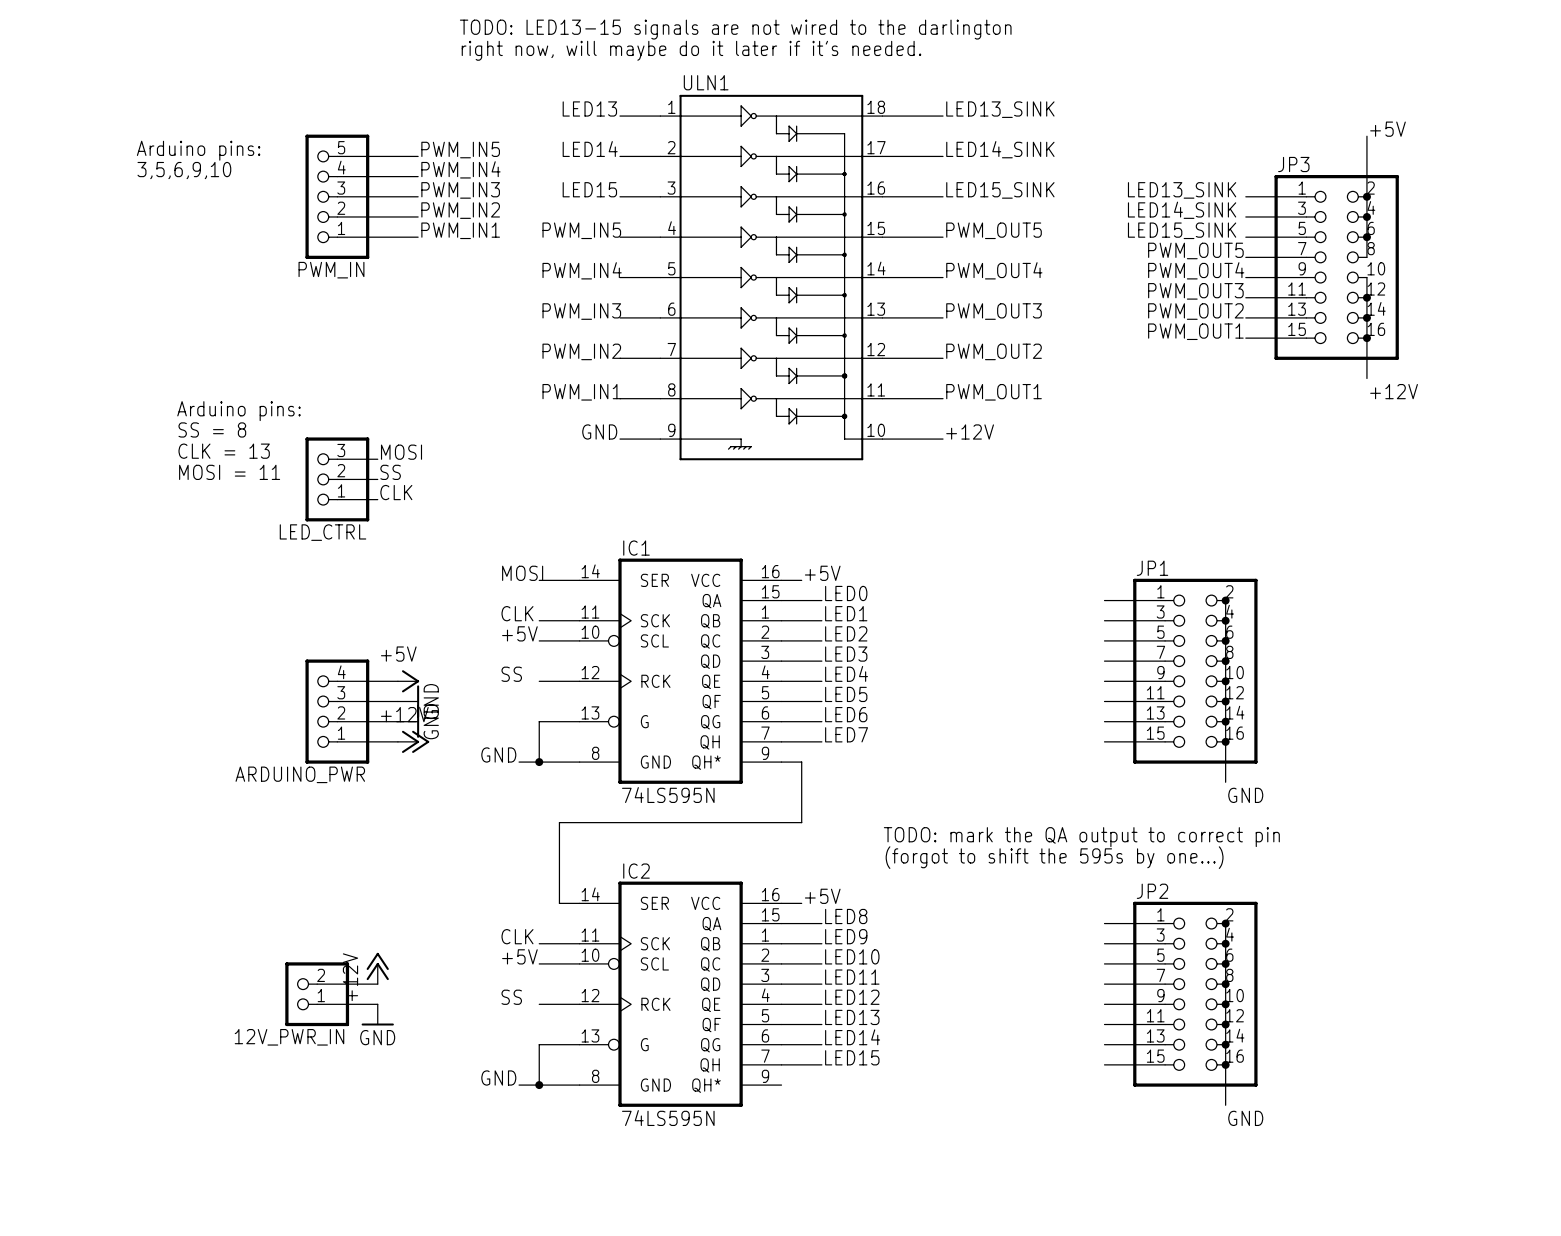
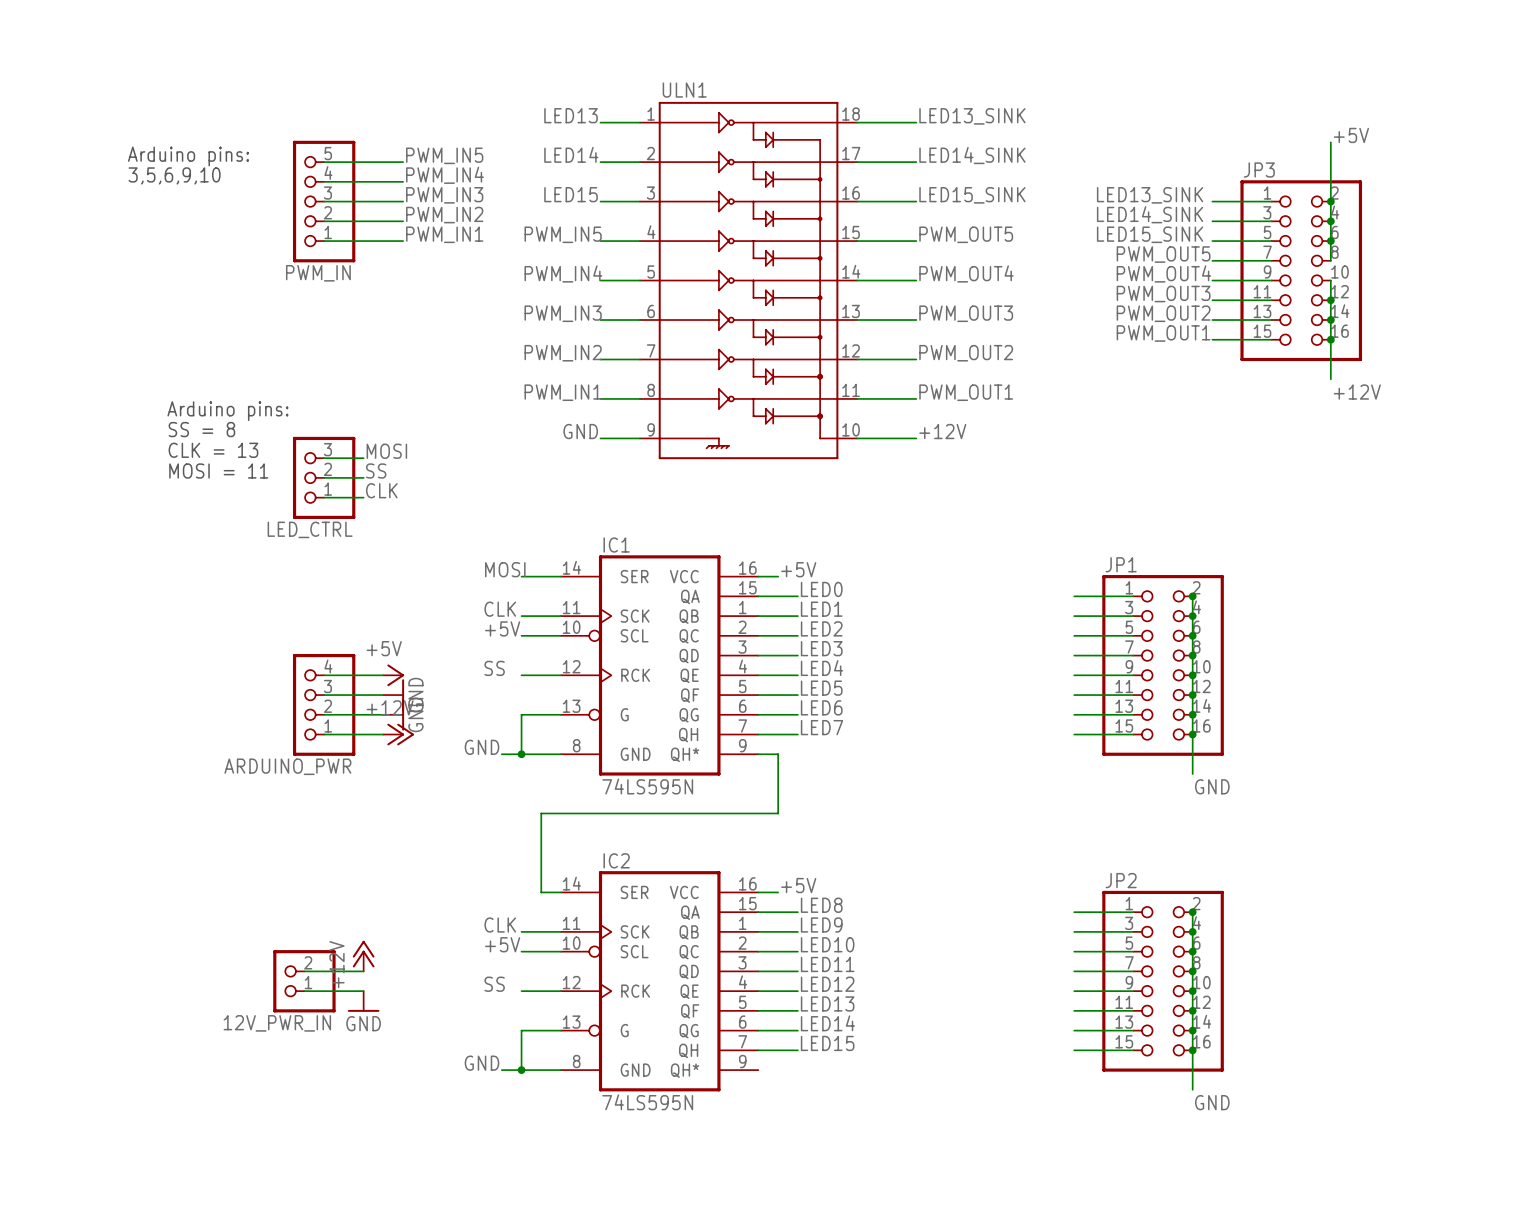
text: TODO: LED13-15 signals are not wired to the darlington (735, 29) -> none
text: right now, will maybe do it later if it's needed. (691, 50) -> none
text: TODO: mark the QA output to correct pin (1081, 837) -> none
text: (forgot to shift the 595s by one...) (1054, 857) -> none

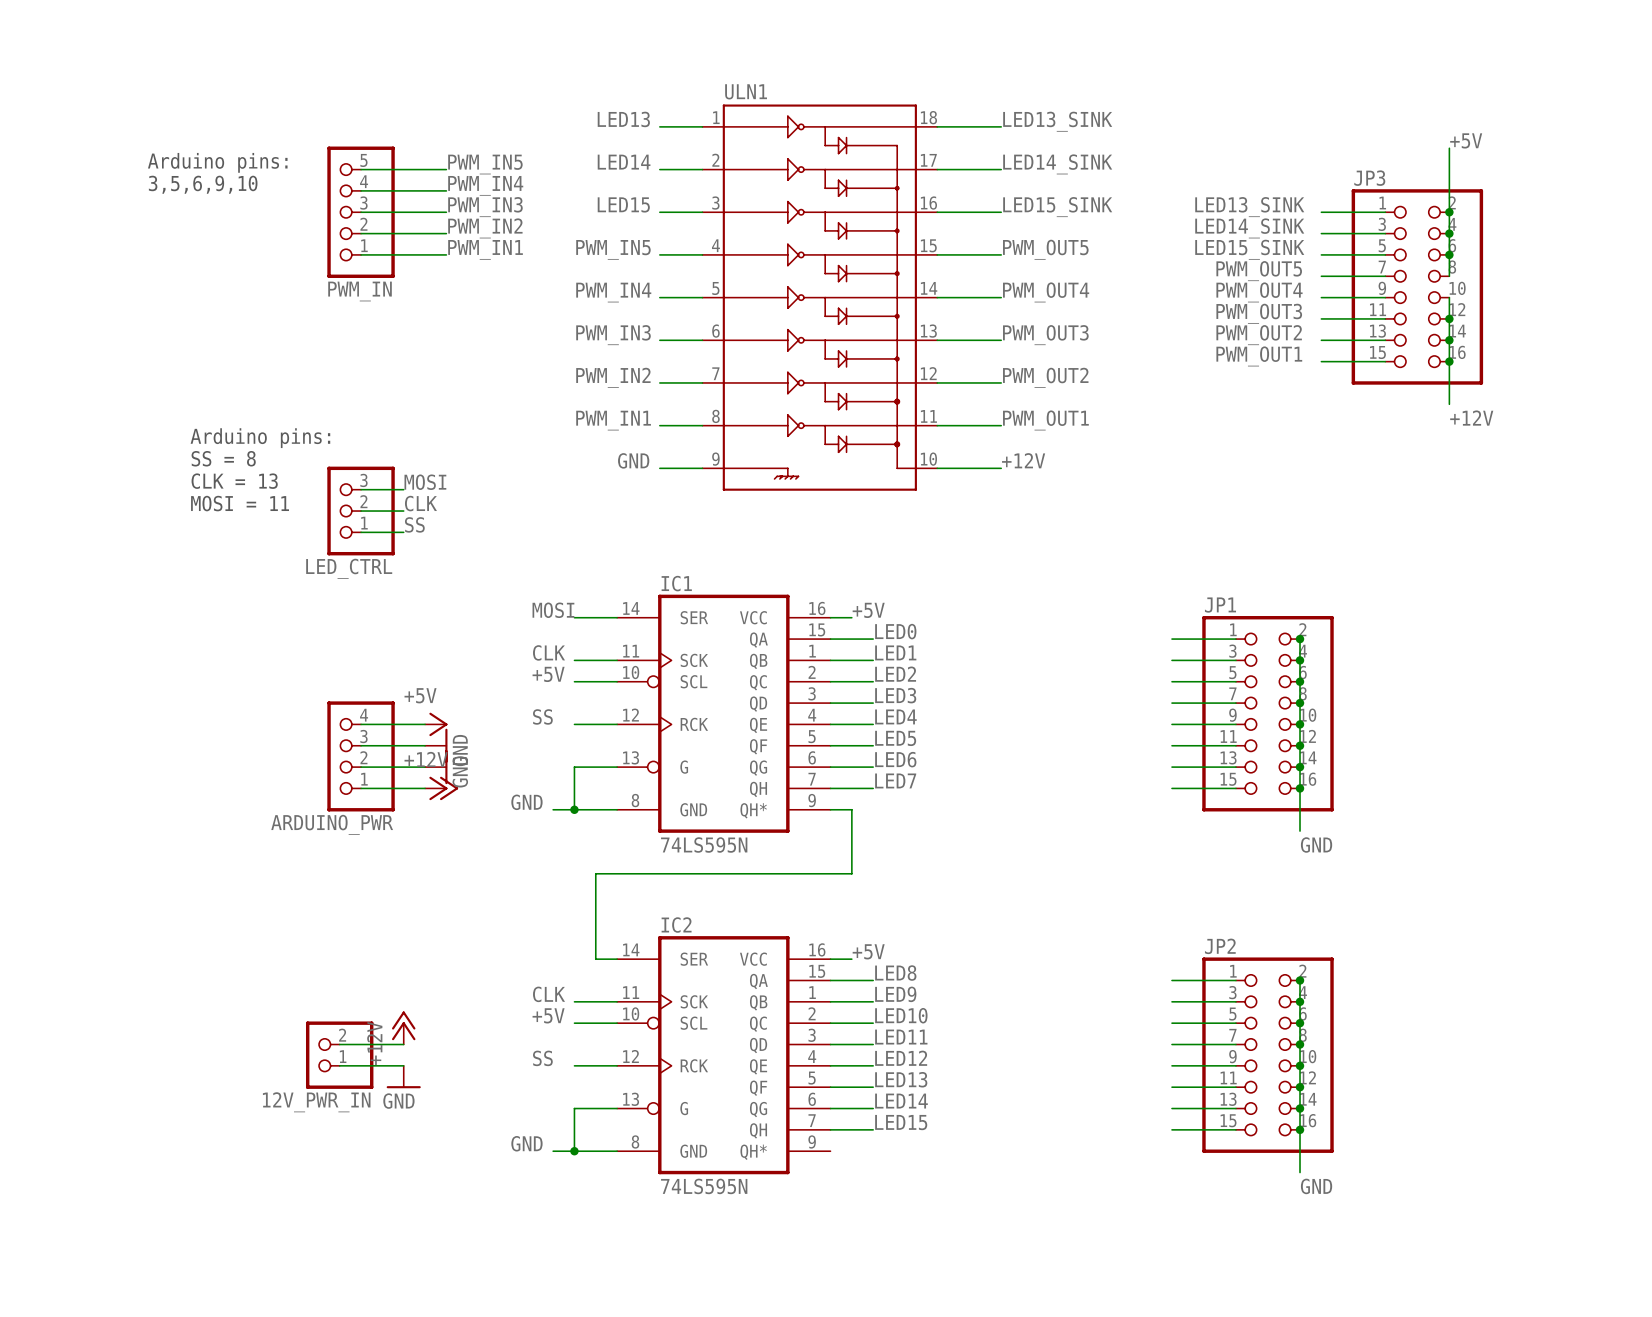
label: SS (376, 471) -> CLK (420, 503)
label: CLK (381, 490) -> SS (414, 524)

